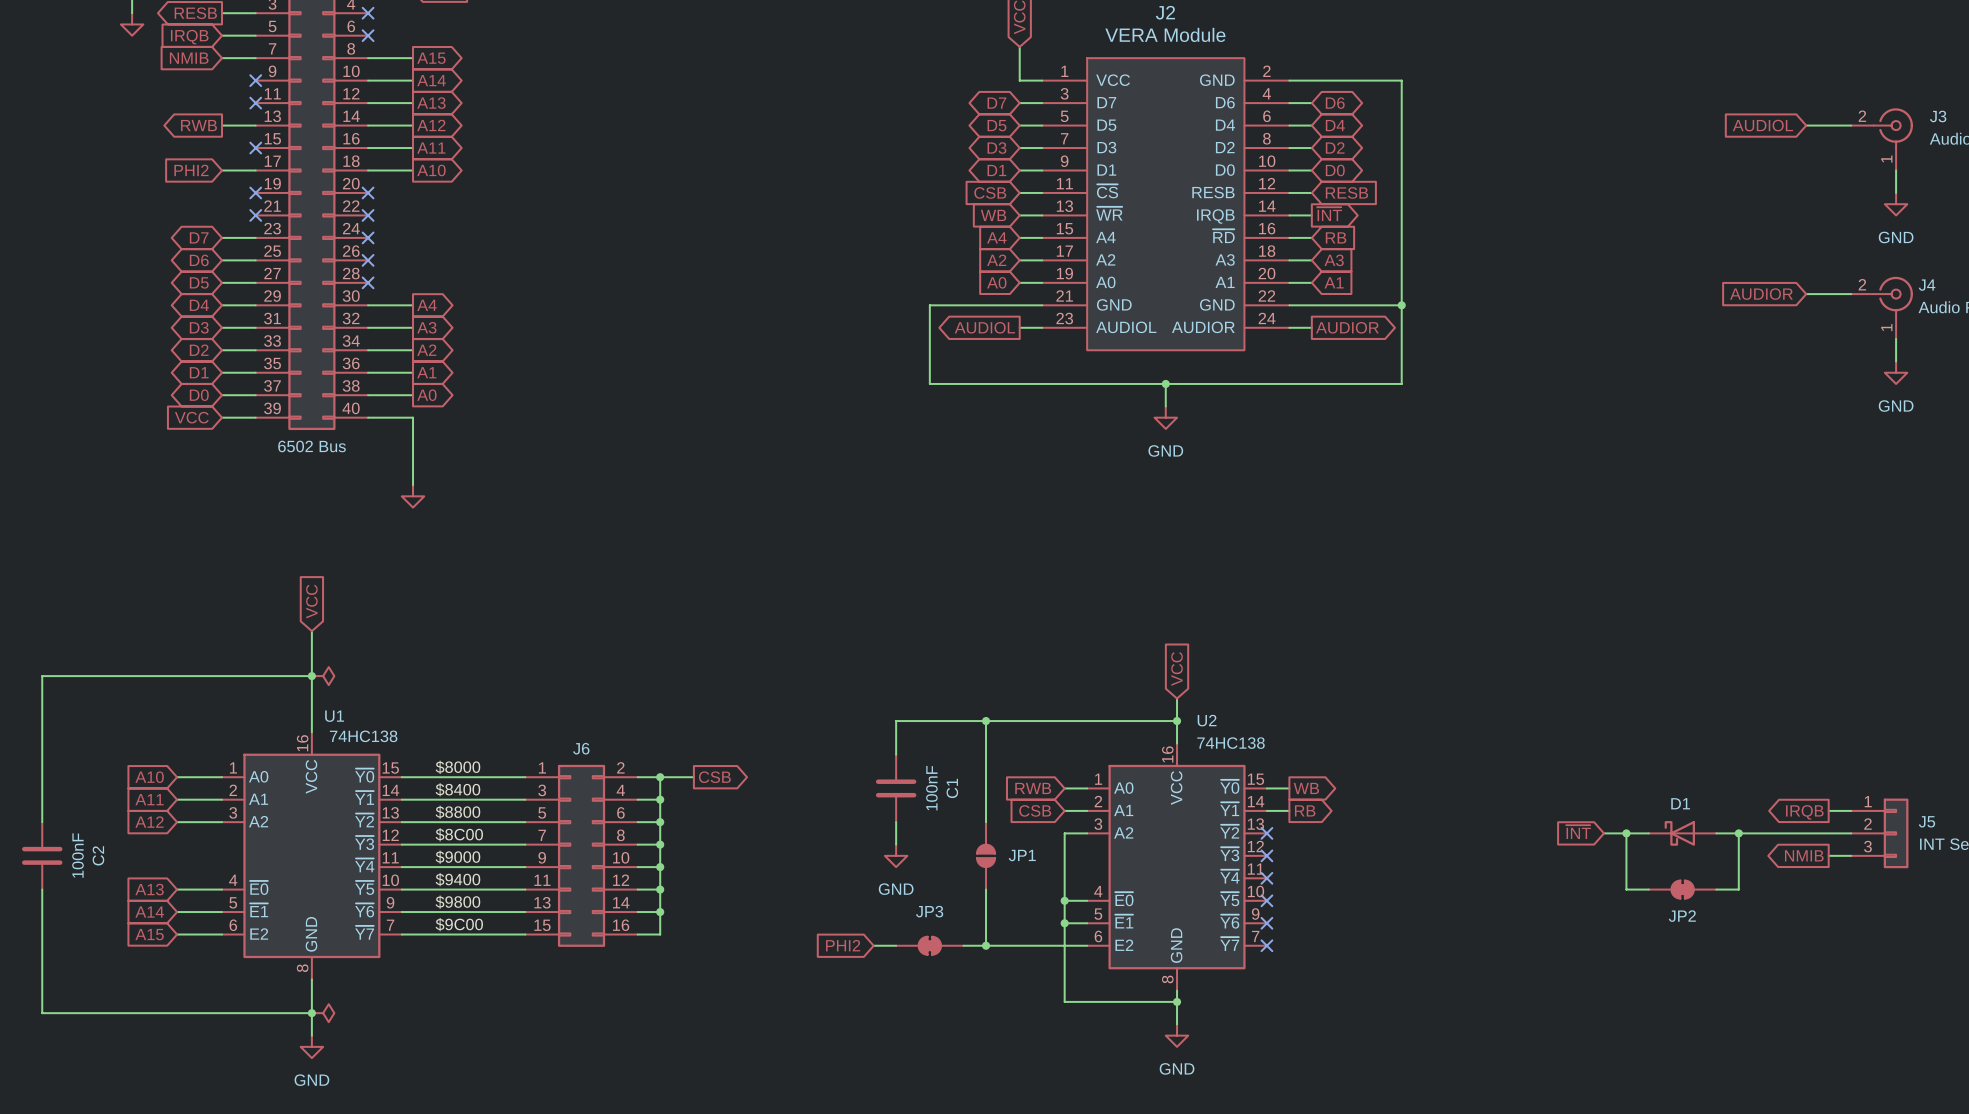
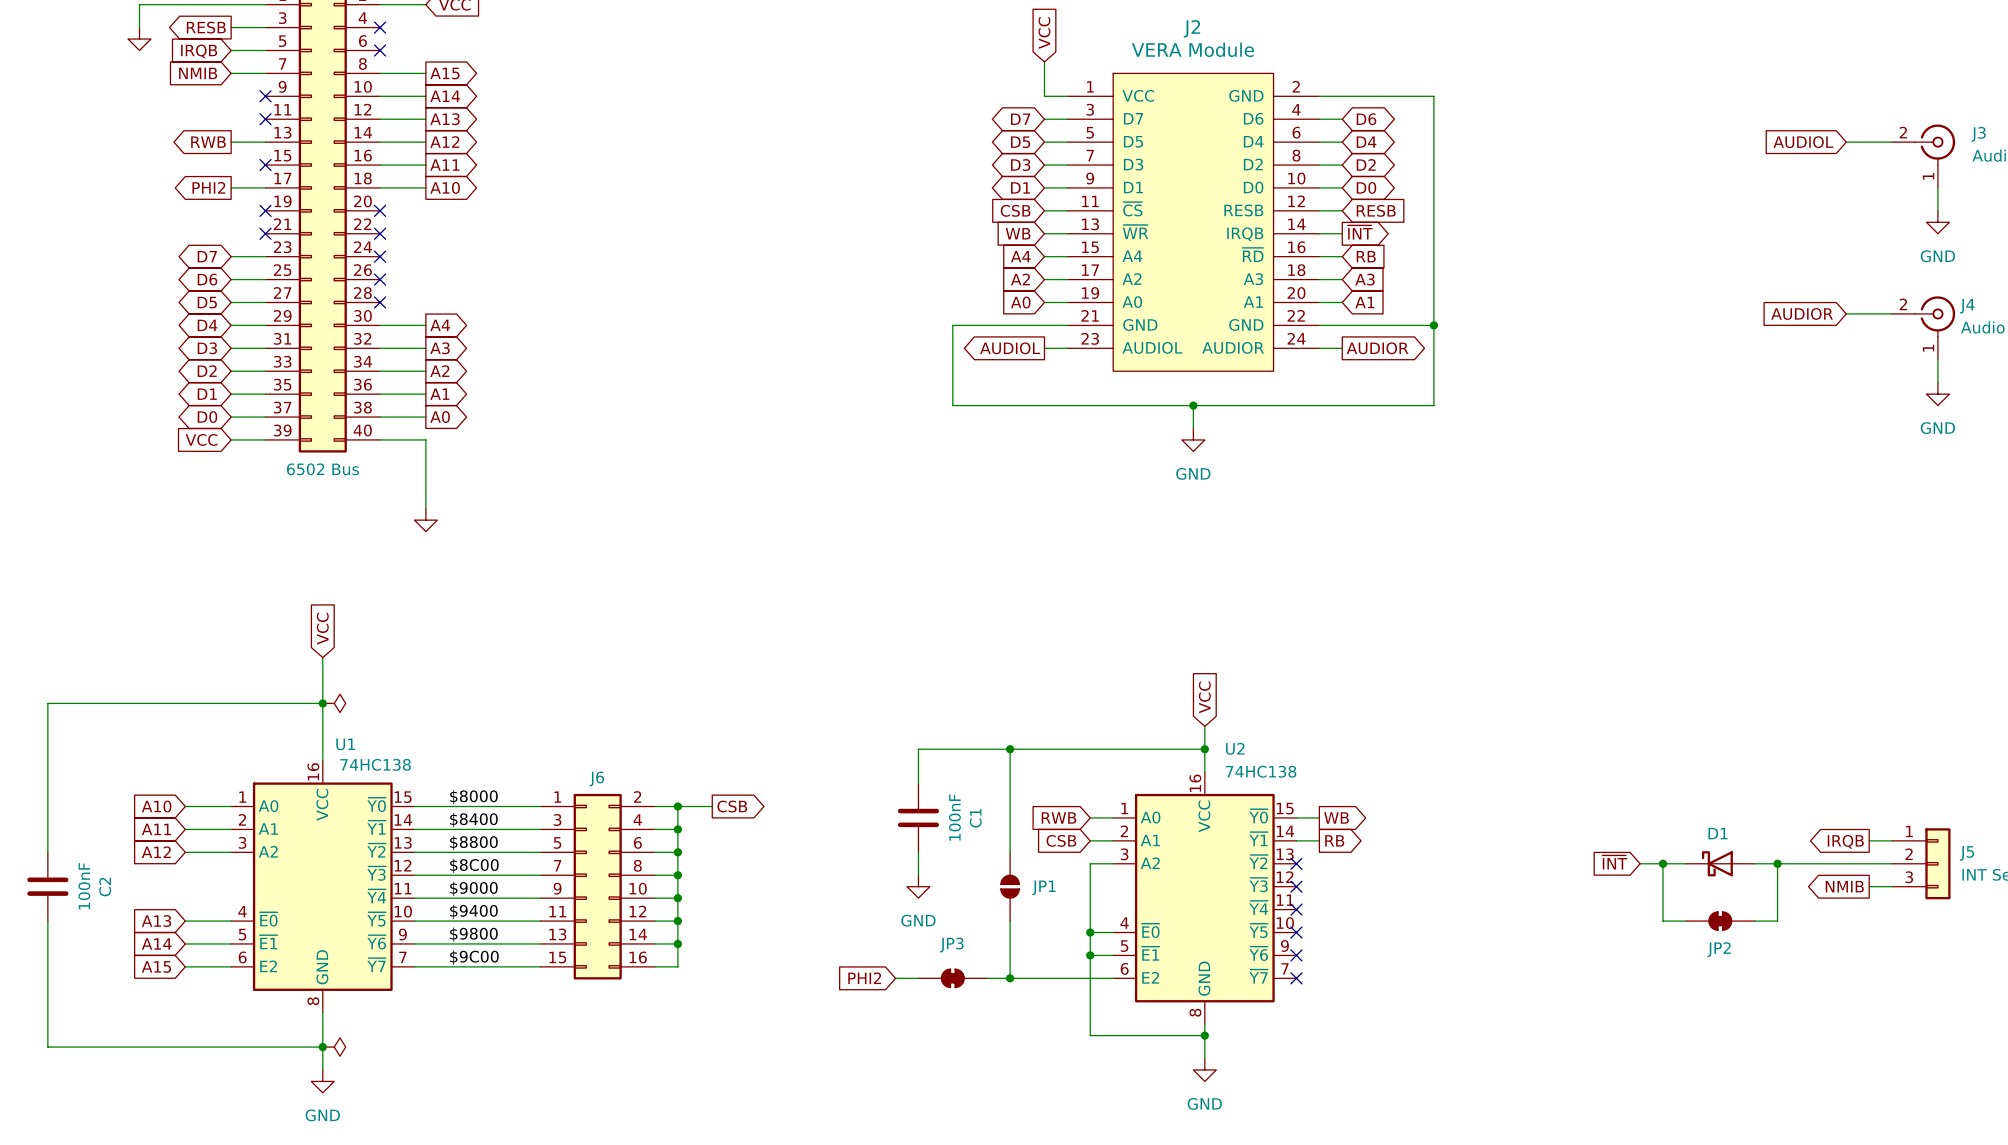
global label shape: input (191, 170) -> output (208, 187)

